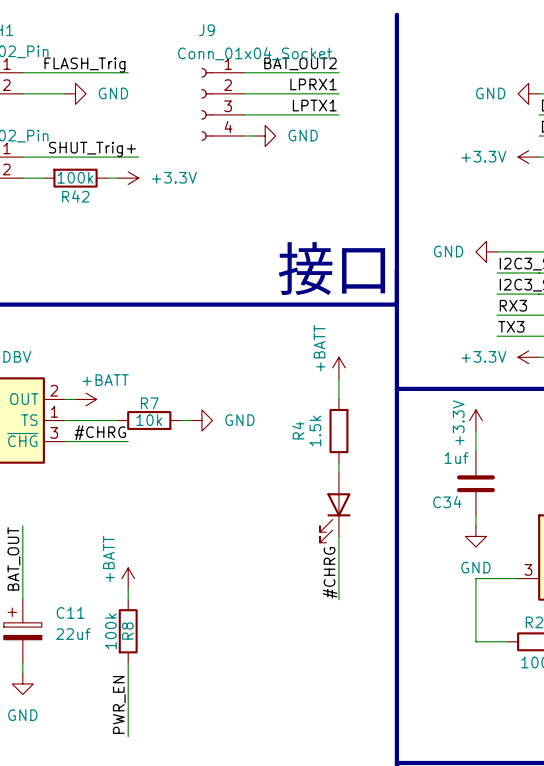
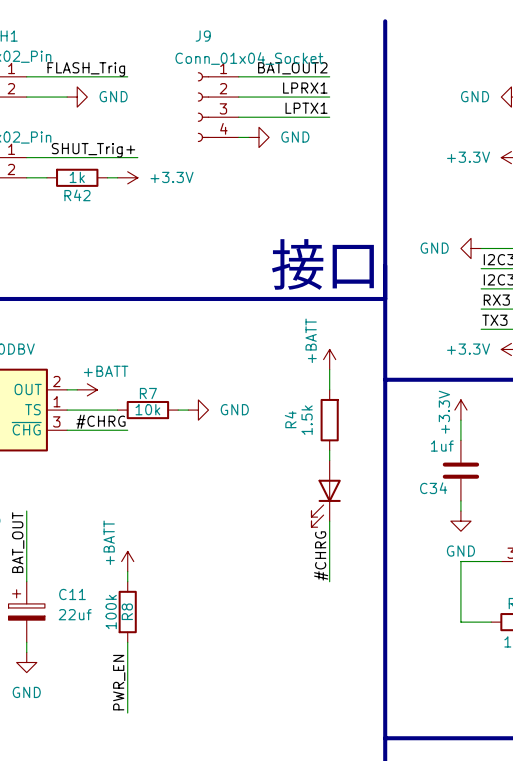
R42 value: 100k (75, 177) -> 1k (77, 177)

